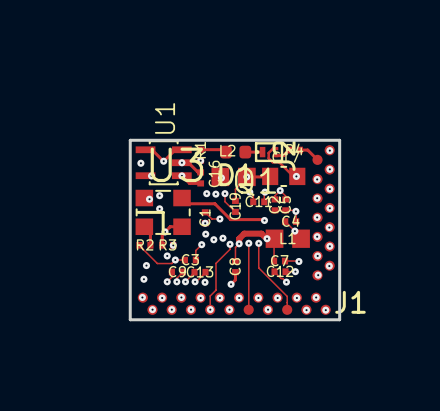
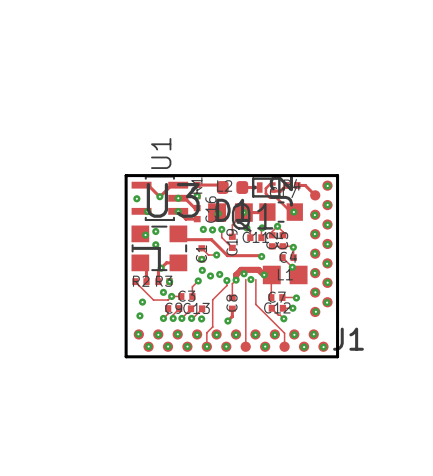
via: none -> (244, 273)
via: (248, 243) -> none
via: none -> (250, 279)
via: (258, 243) -> none

